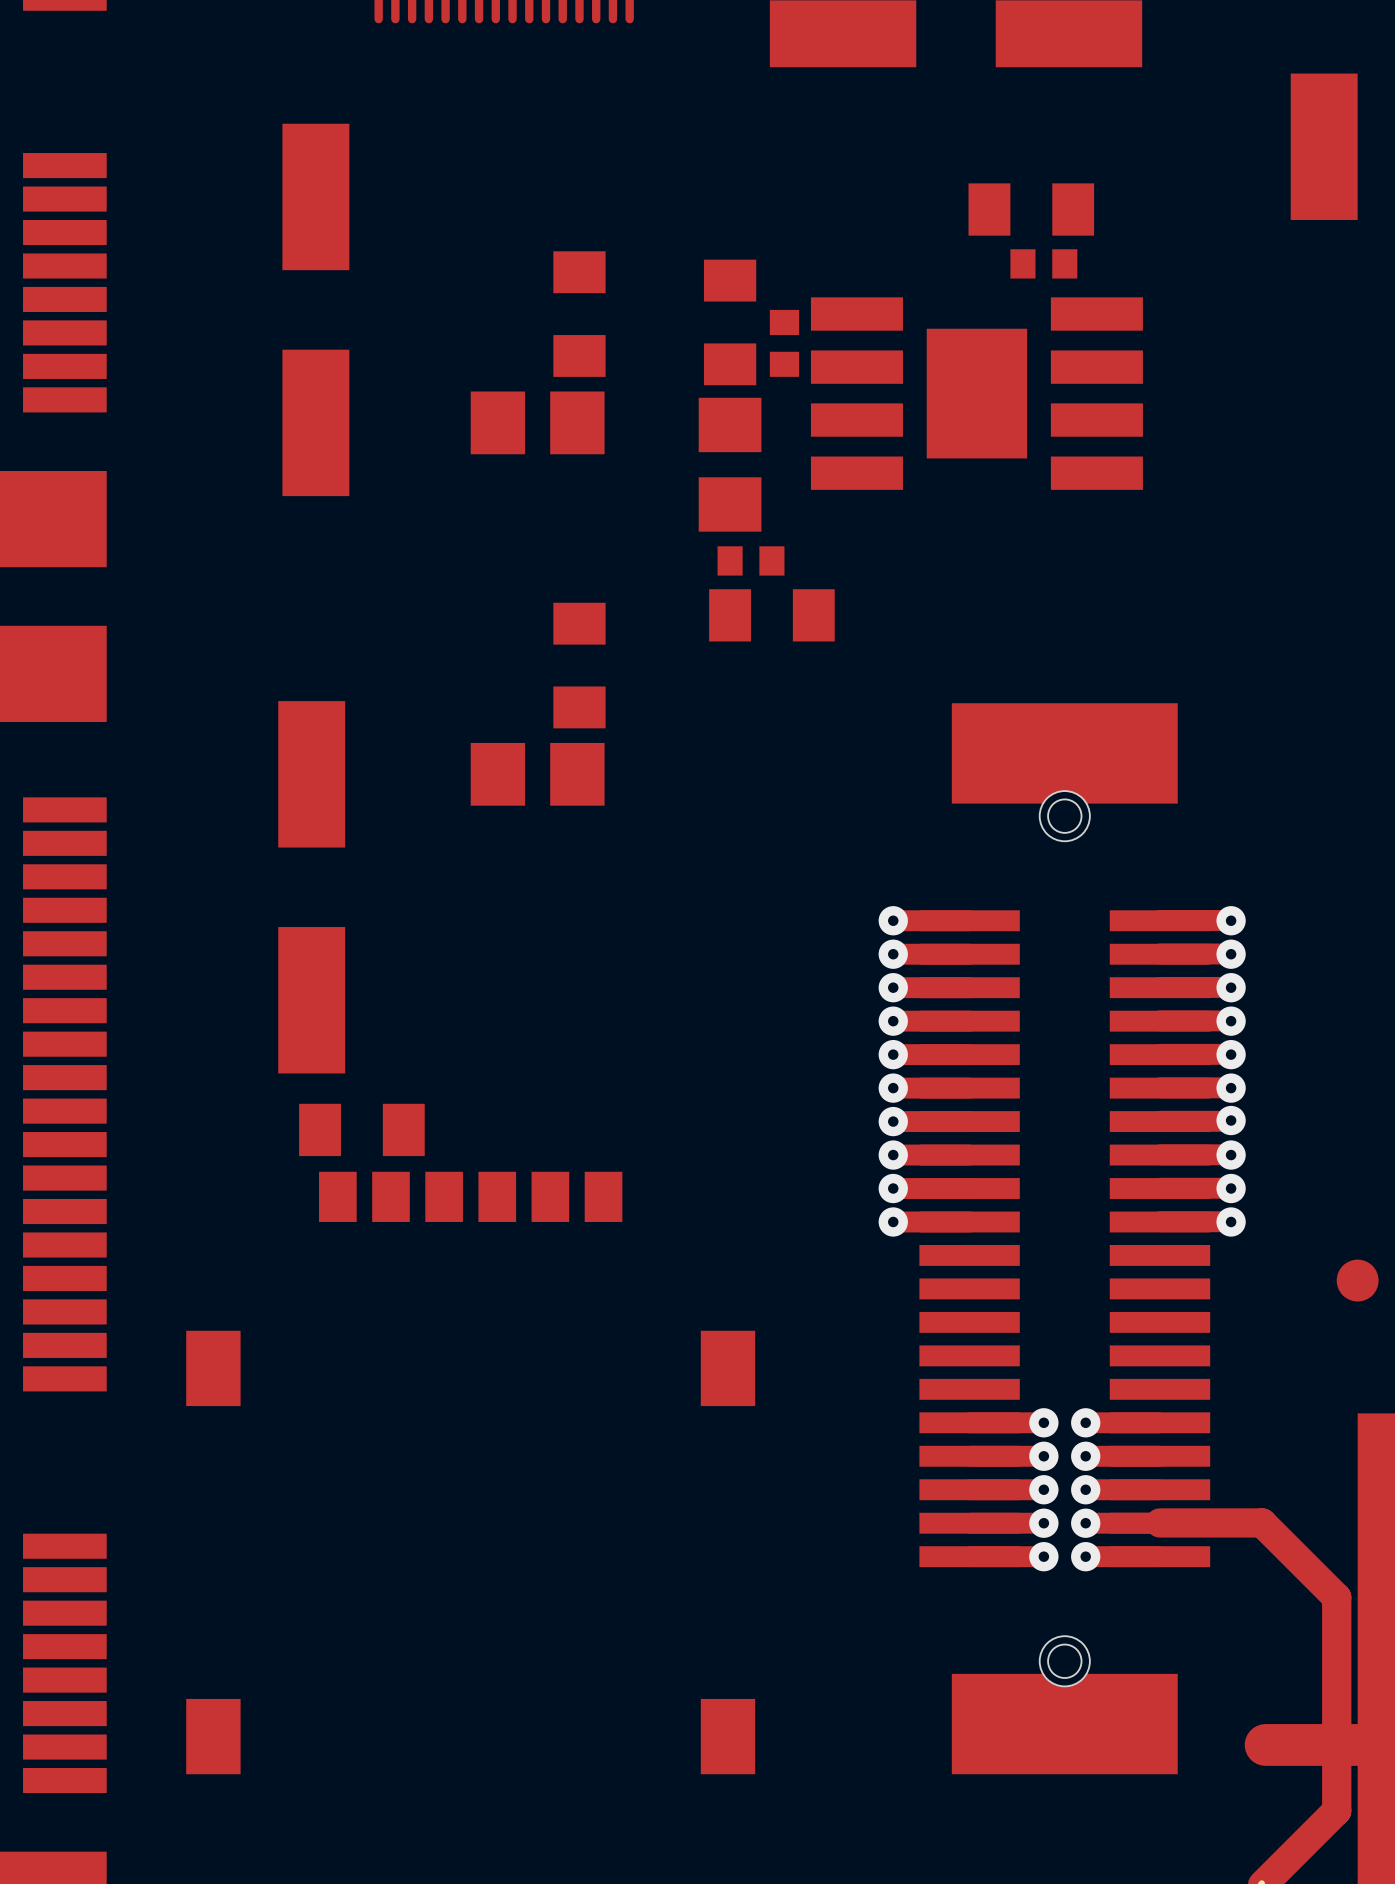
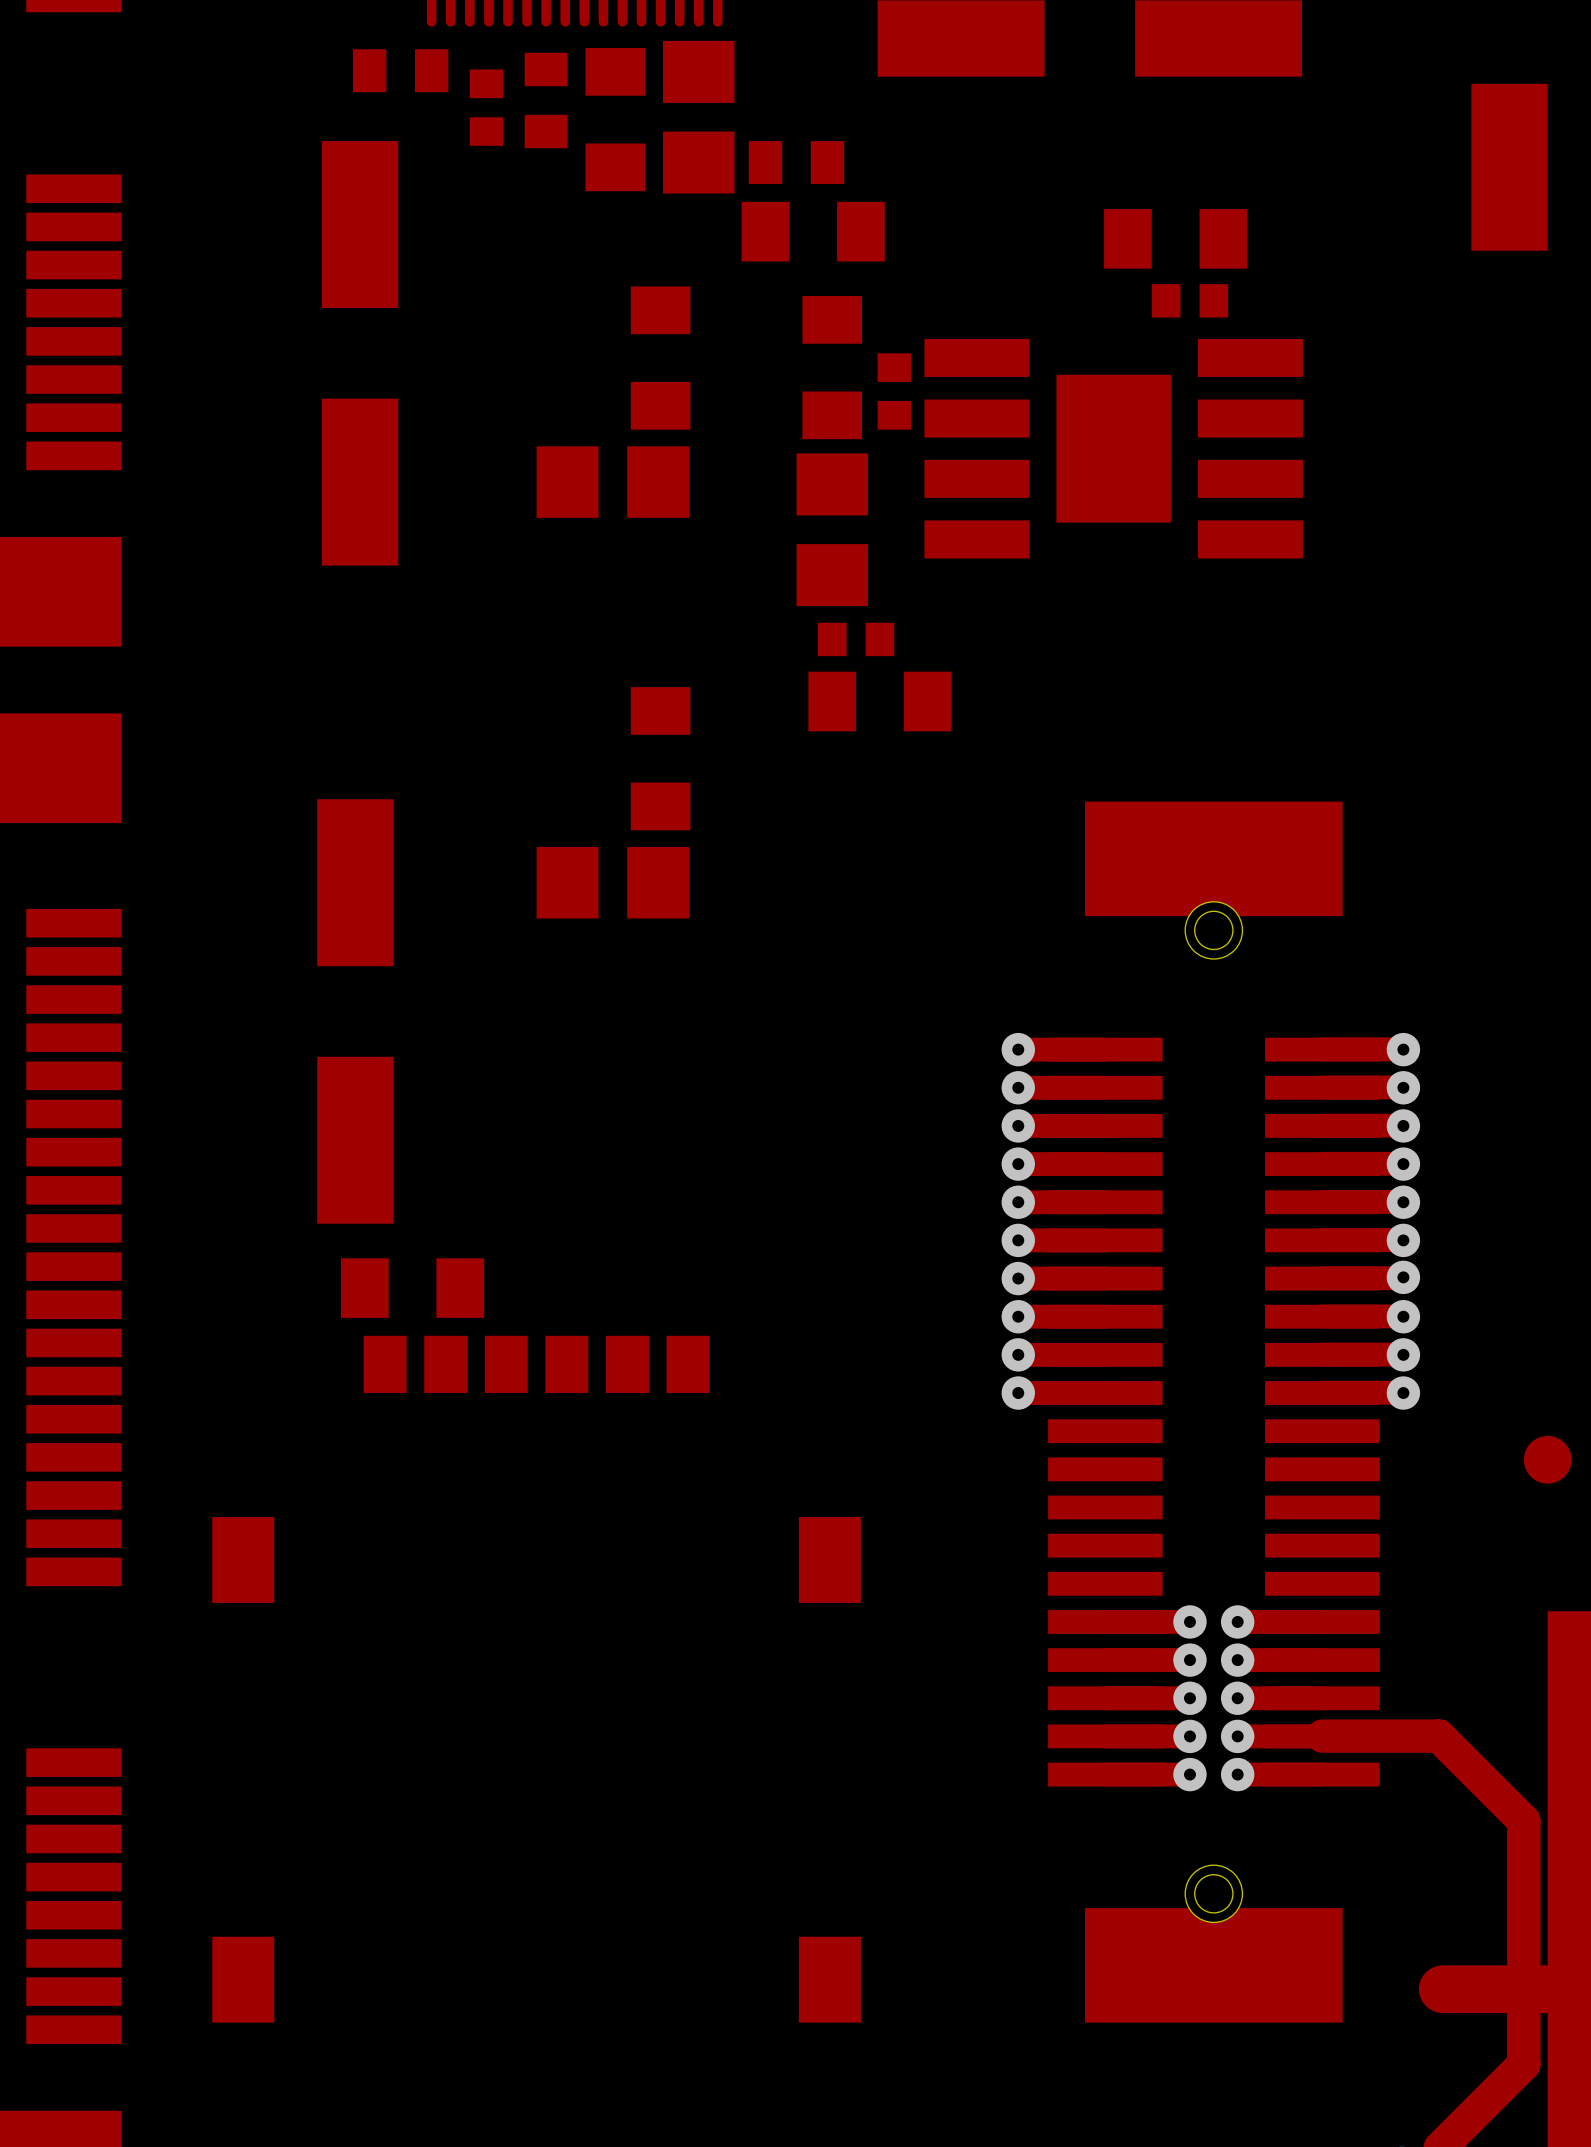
part: none -> (400, 70)
part: none -> (546, 100)
part: none -> (486, 107)
part: none -> (698, 117)
part: none -> (615, 119)
part: none -> (796, 162)
part: none -> (813, 231)

